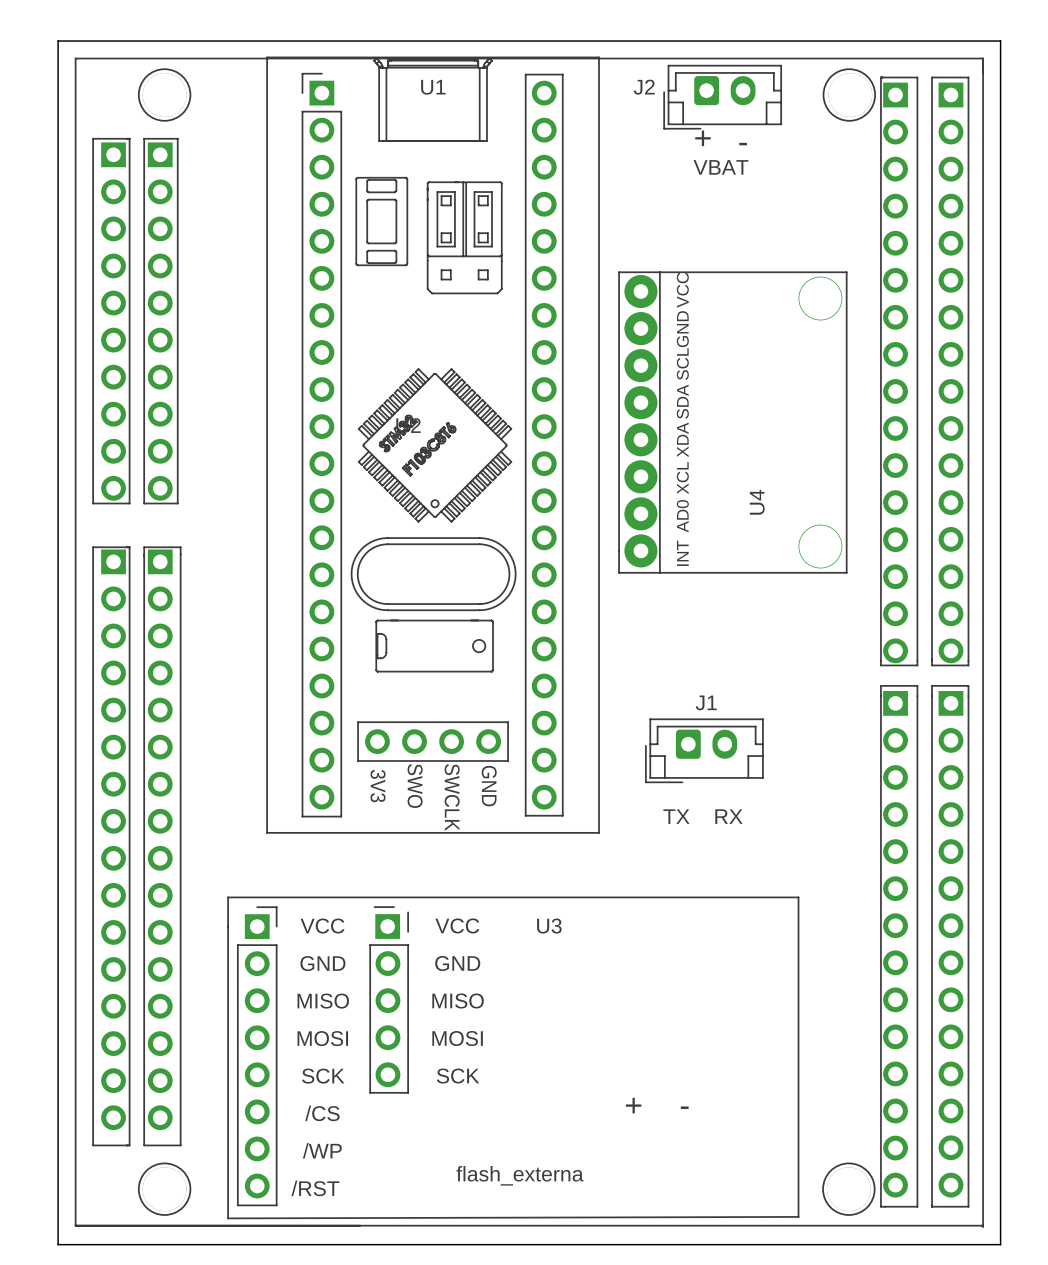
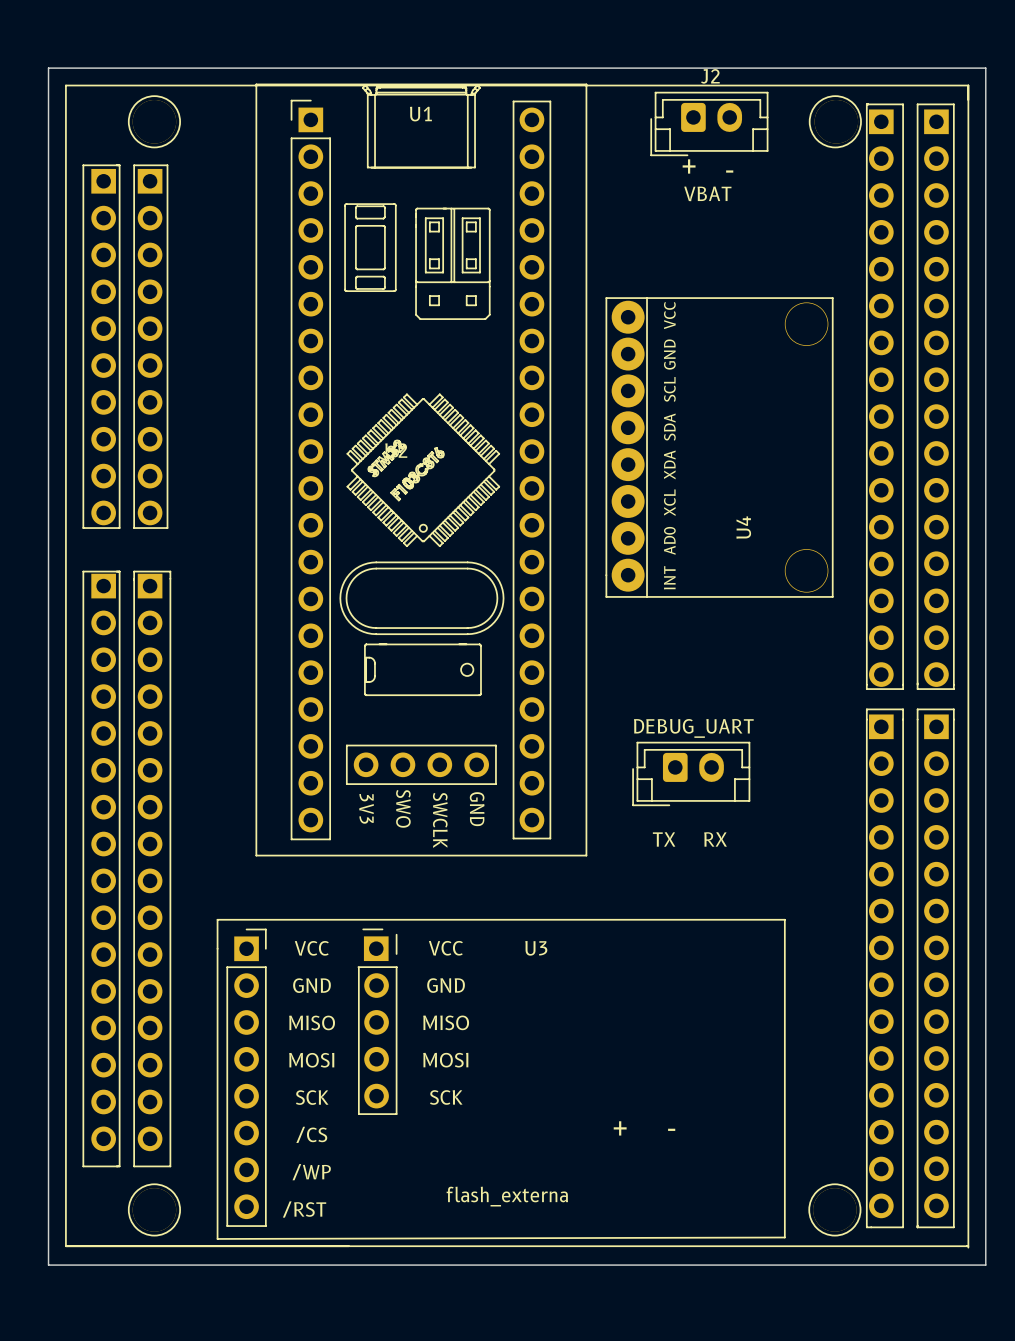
J2 name position: J2 (644, 87) -> J2 (710, 76)
J1 name: J1 (706, 702) -> DEBUG_UART (693, 728)

